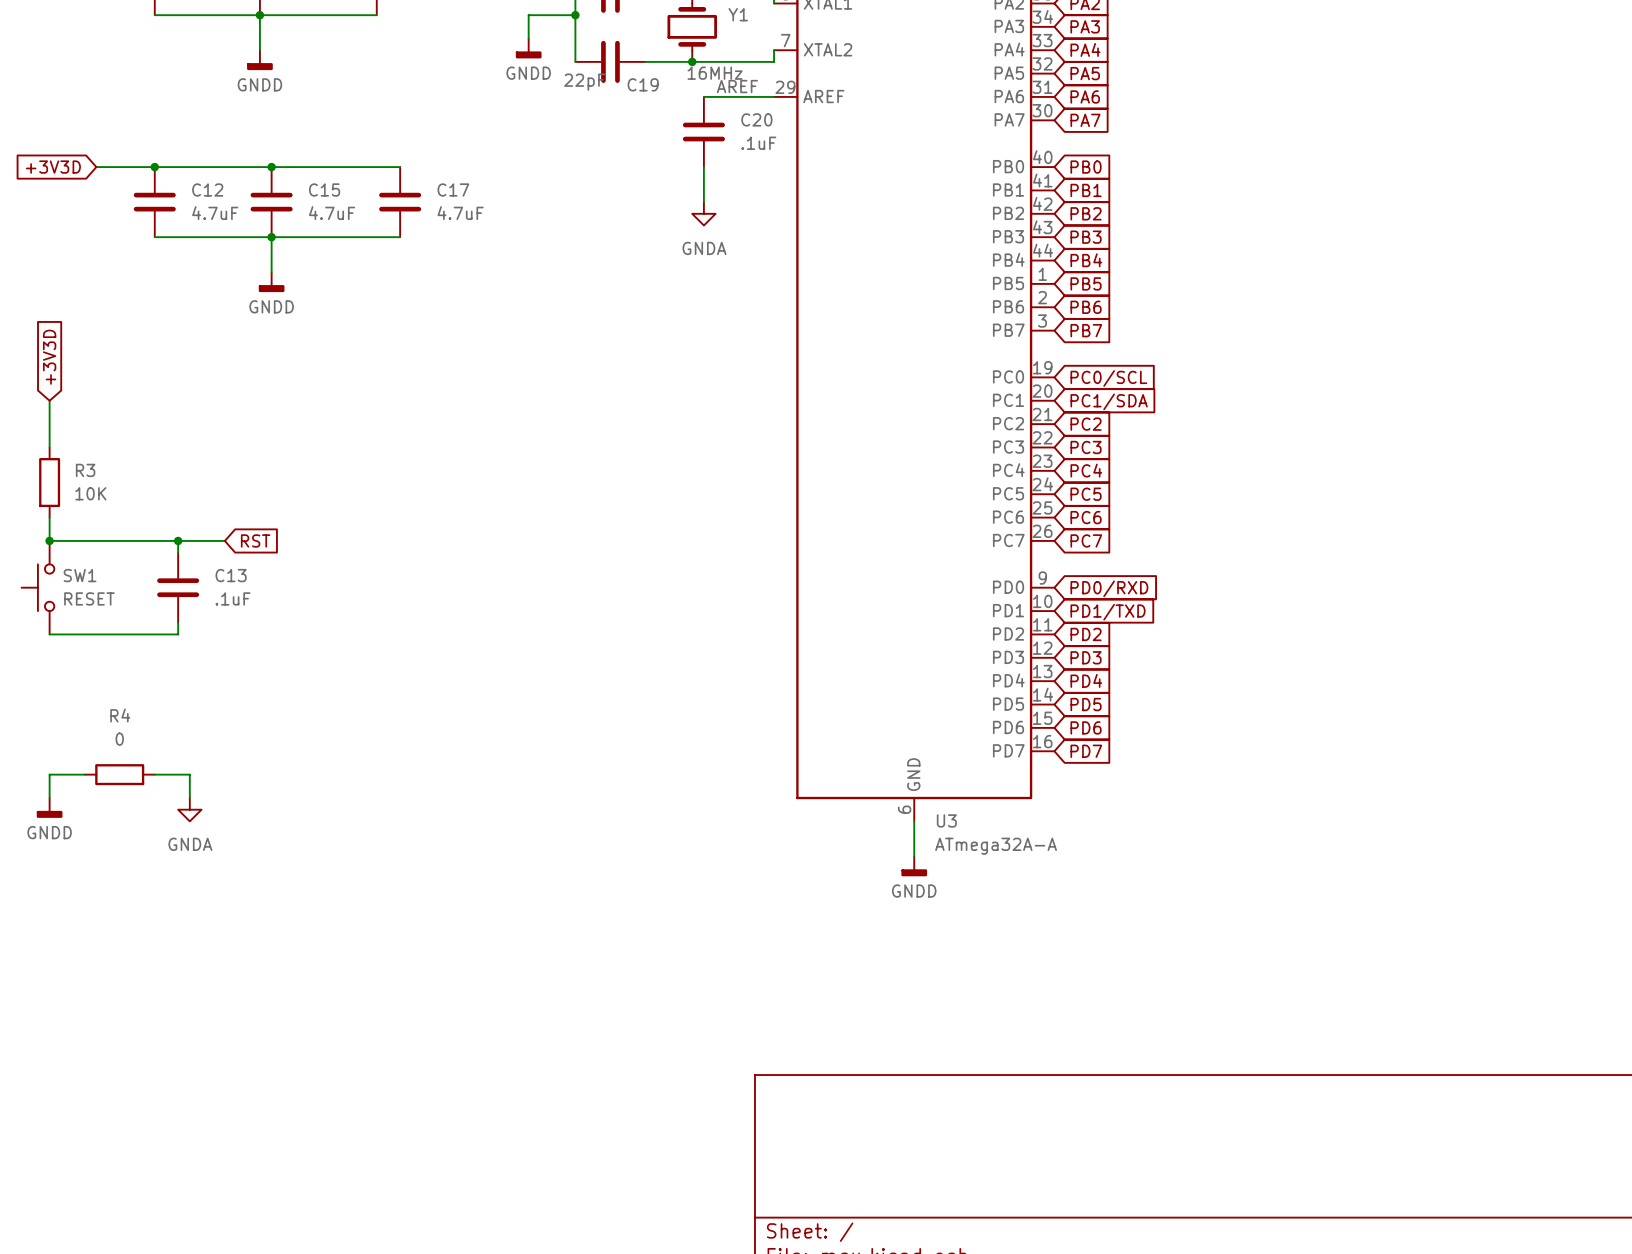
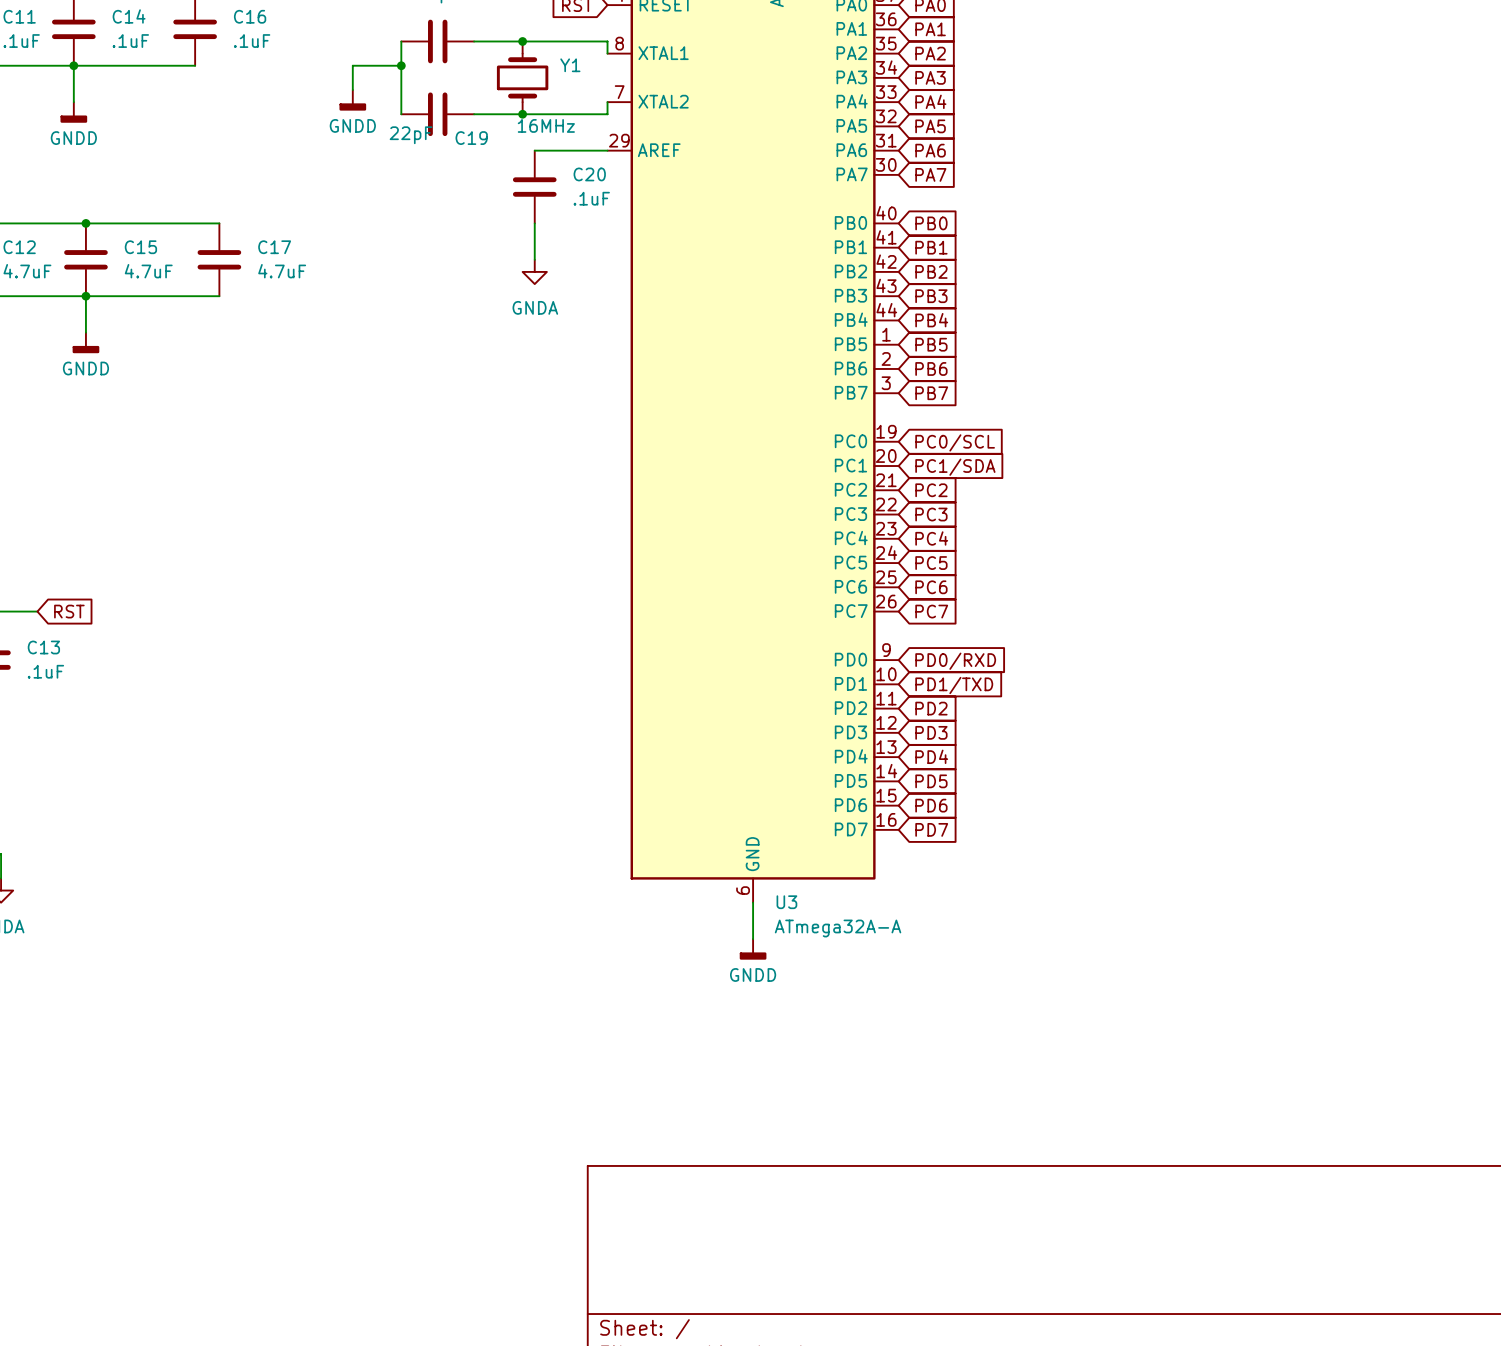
label: AREF (737, 86) -> none

